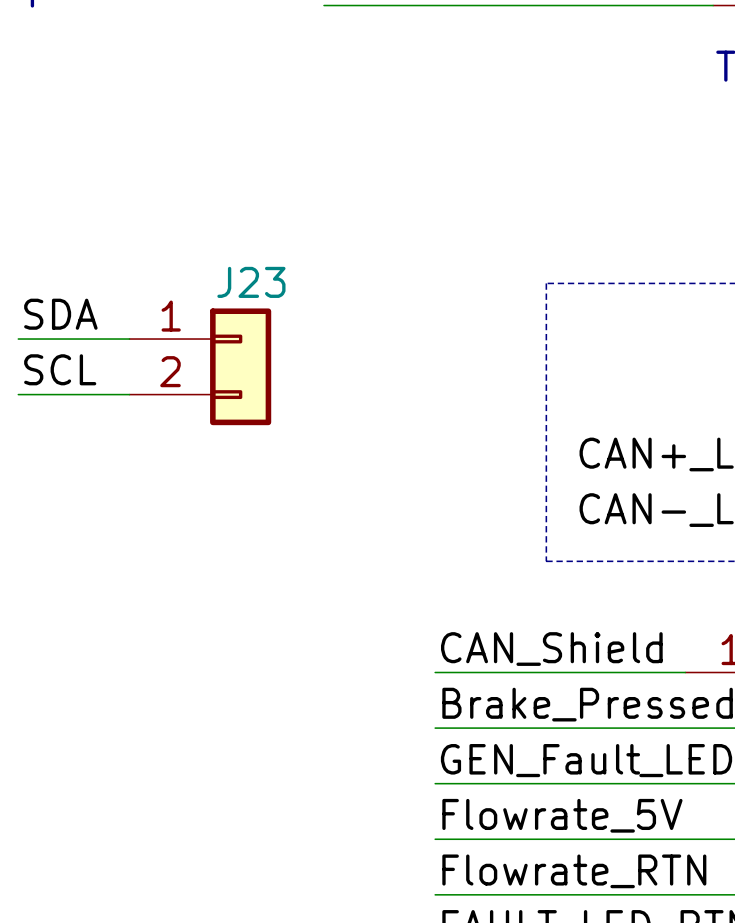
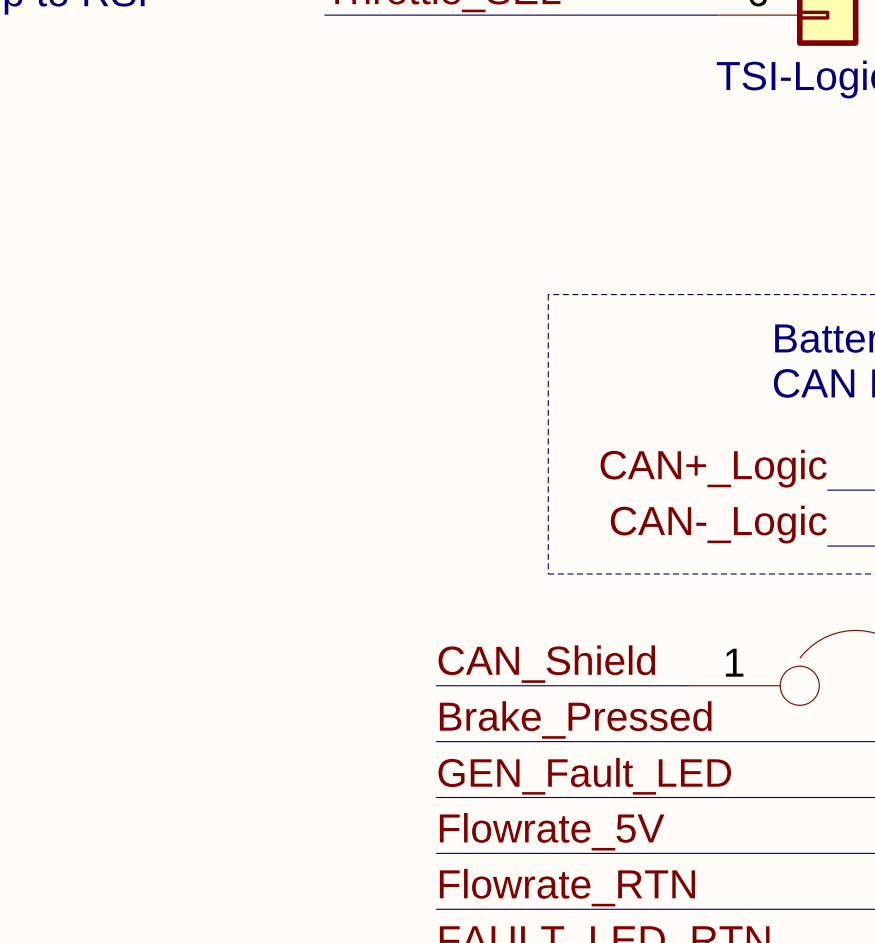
label: SDA (60, 314) -> none
wire: (18, 339) (129, 339) -> none
J23: (200, 366) -> none
label: SCL (60, 369) -> none
wire: (18, 394) (129, 394) -> none

